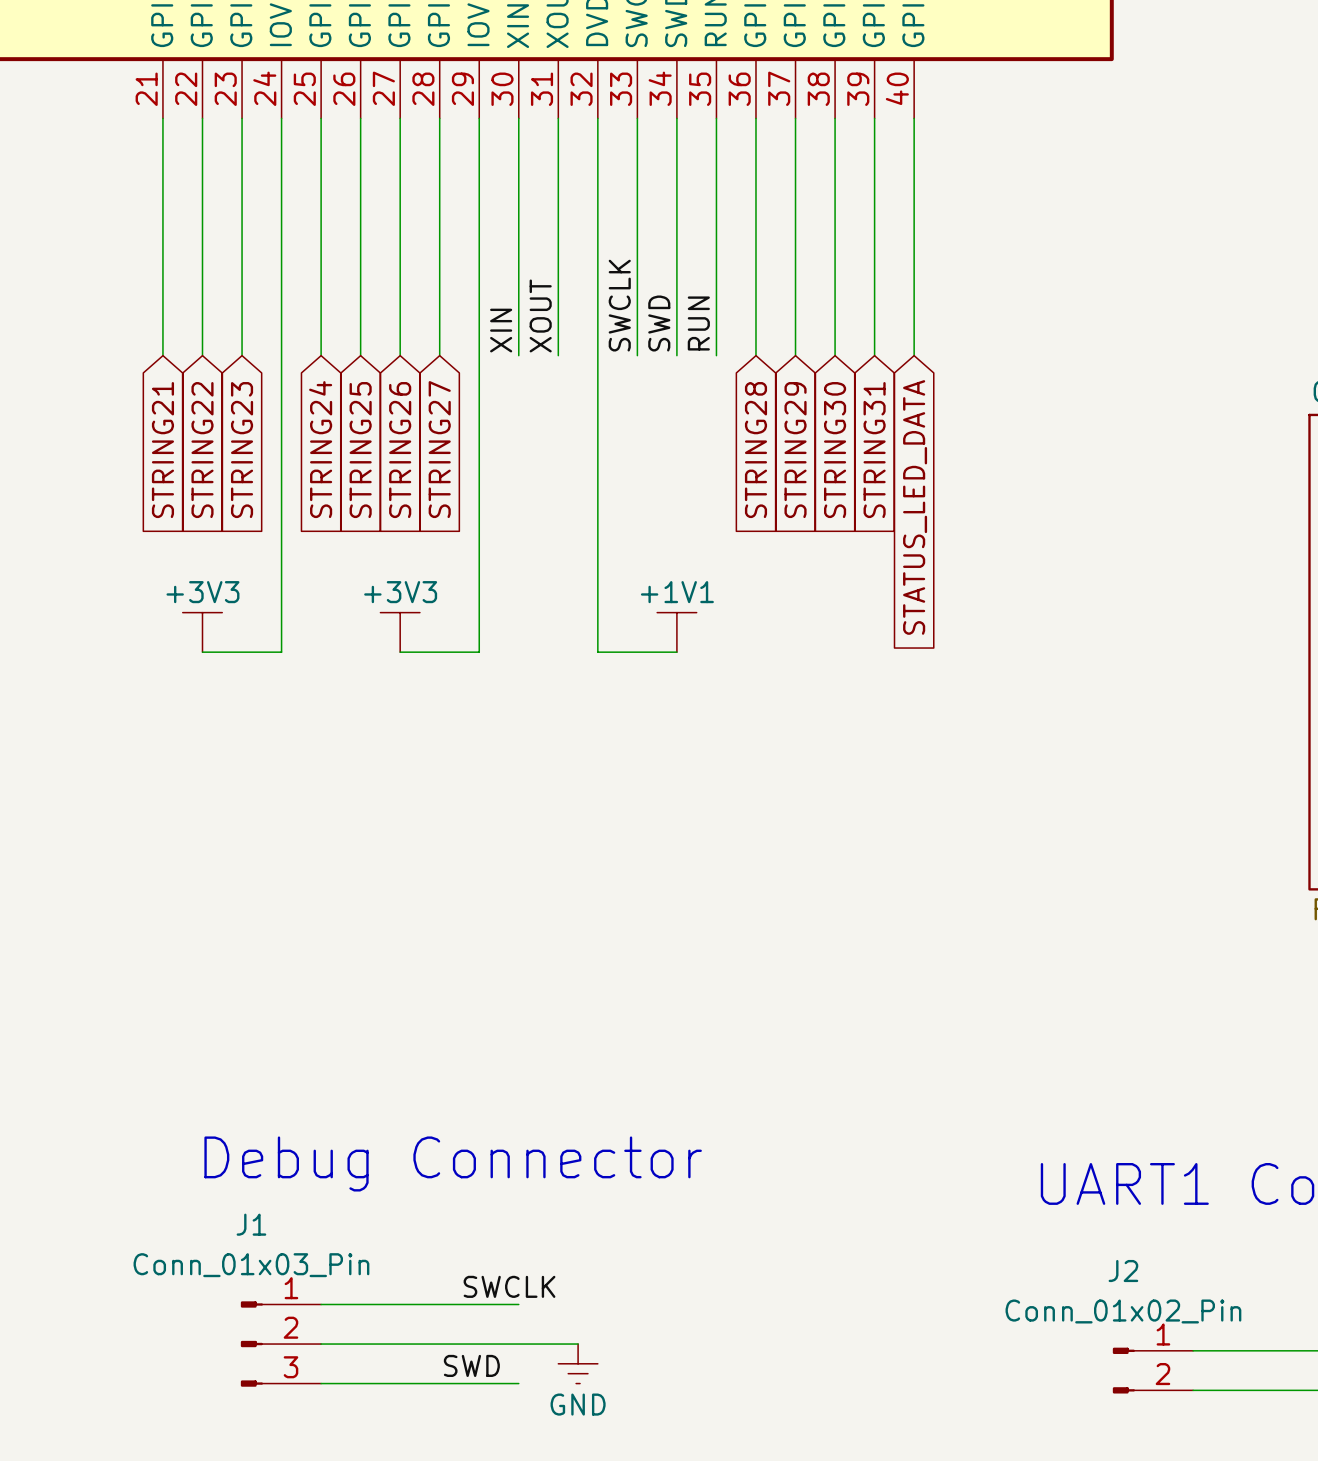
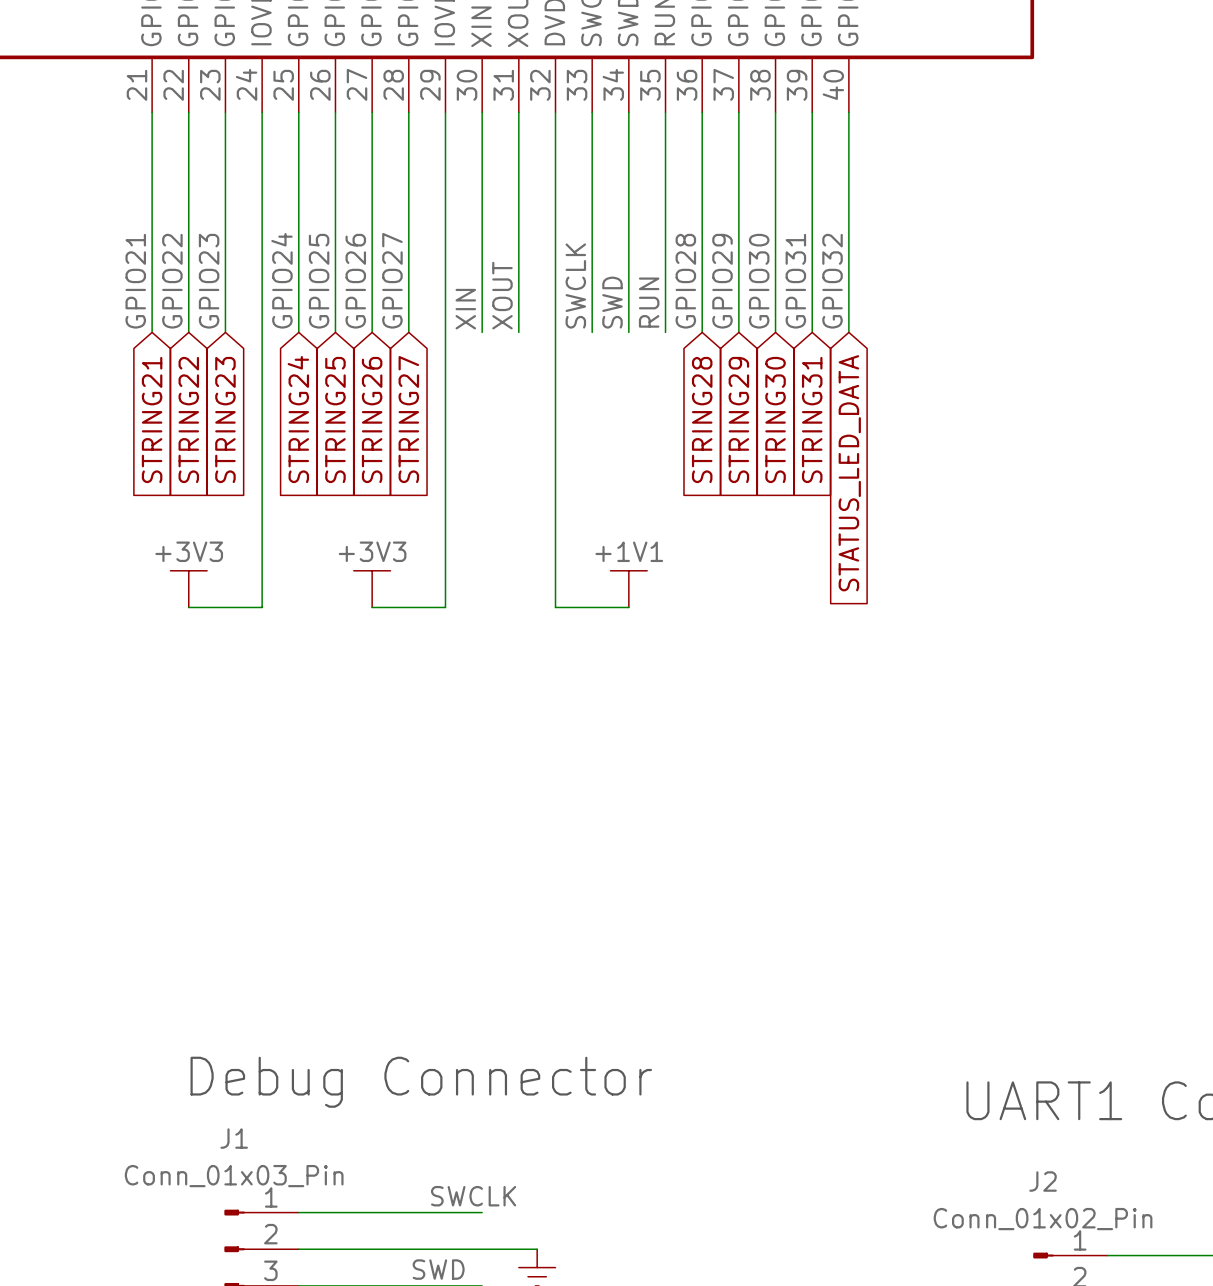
label: none -> GPIO24 (281, 280)
label: none -> GPIO27 (392, 280)
label: none -> GPIO21 (135, 281)
label: none -> GPIO22 (172, 281)
label: none -> GPIO23 (209, 281)
label: none -> GPIO25 (319, 281)
label: none -> GPIO26 (355, 281)
label: none -> GPIO28 (685, 281)
label: none -> GPIO29 (722, 281)
label: none -> GPIO30 (759, 281)
label: none -> GPIO31 (795, 281)
label: none -> GPIO32 (832, 281)

